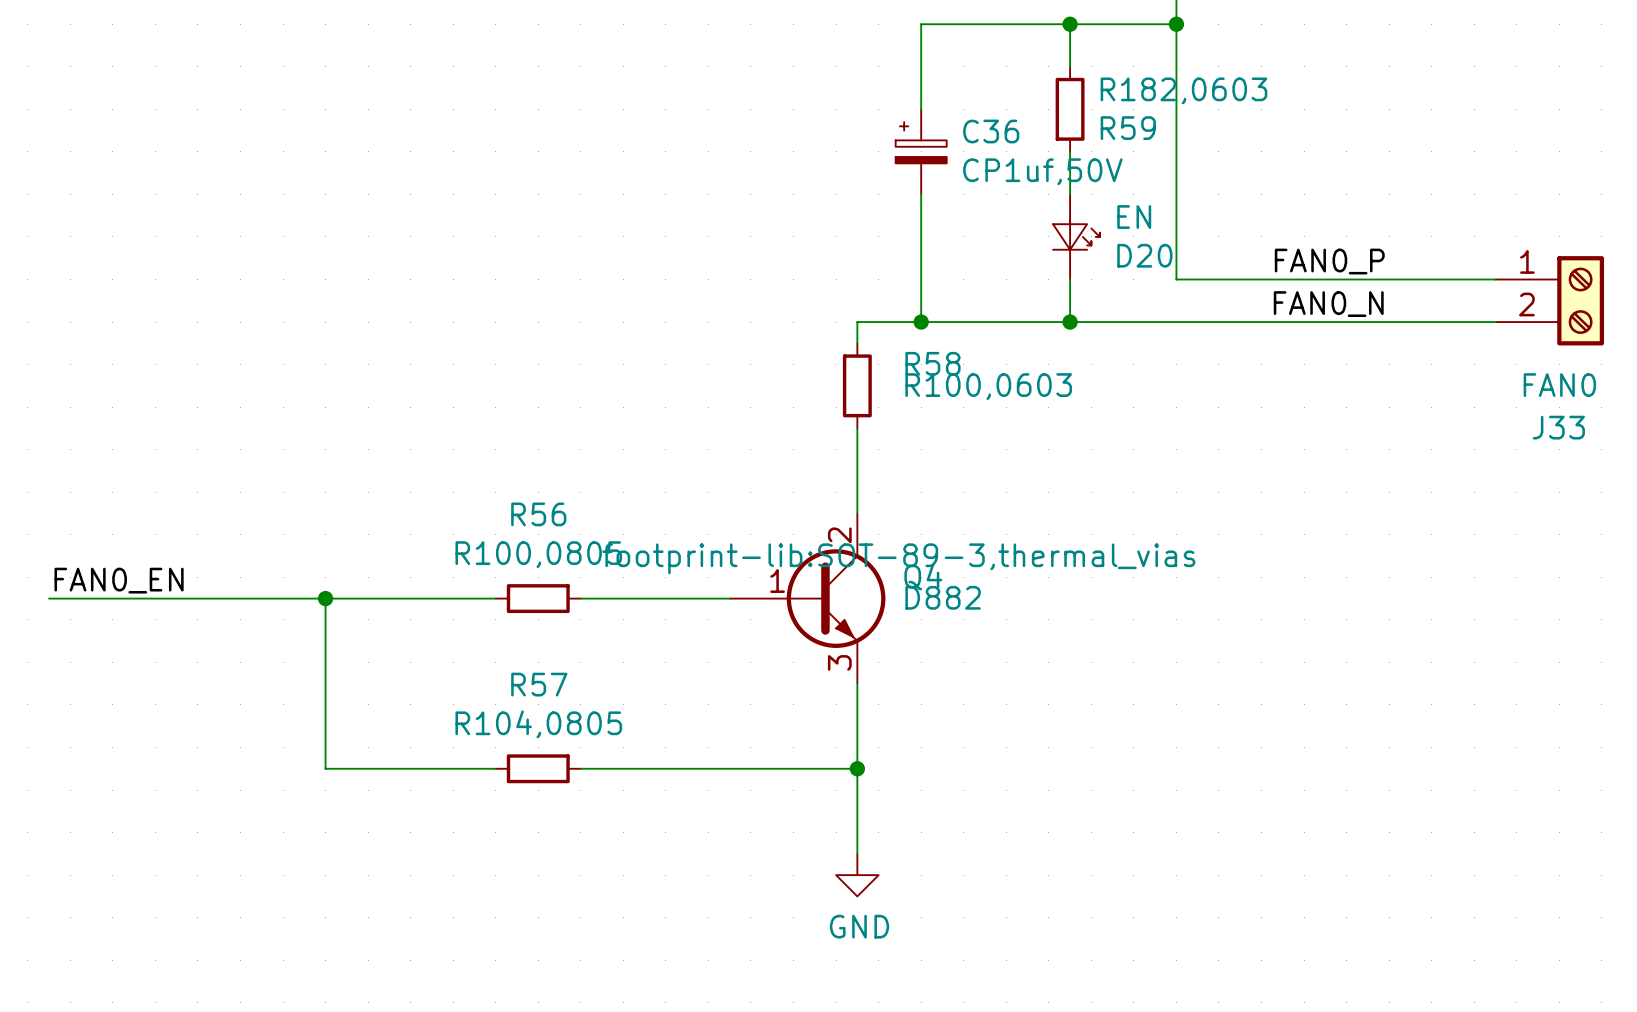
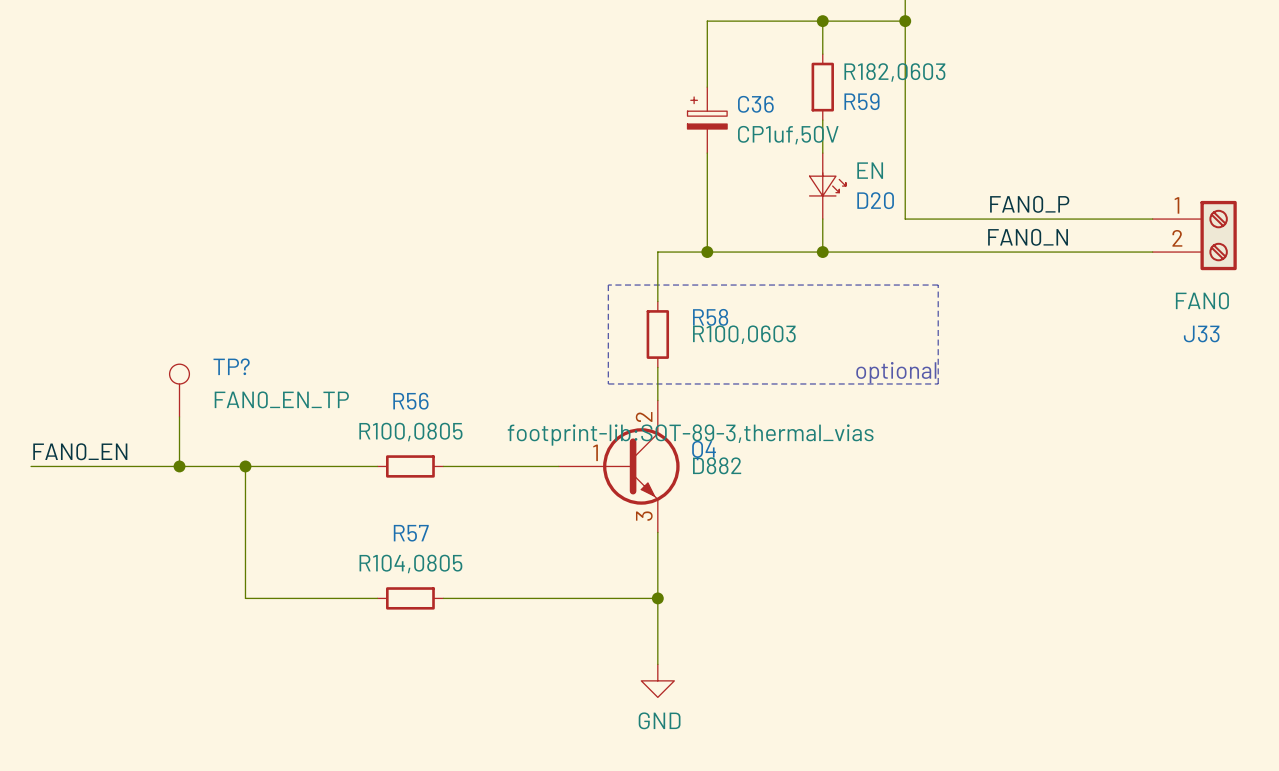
line: none -> (608, 285) (608, 383) (938, 383) (938, 285) (608, 285)
R58 position: (857, 385) -> (657, 334)
wire: (857, 428) (857, 470) -> (657, 268) (657, 301)
text: none -> optional (896, 372)
TP?: none -> FAN0_EN_TP (179, 390)
wire: none -> (179, 416) (179, 466)
junction: none -> (179, 466)

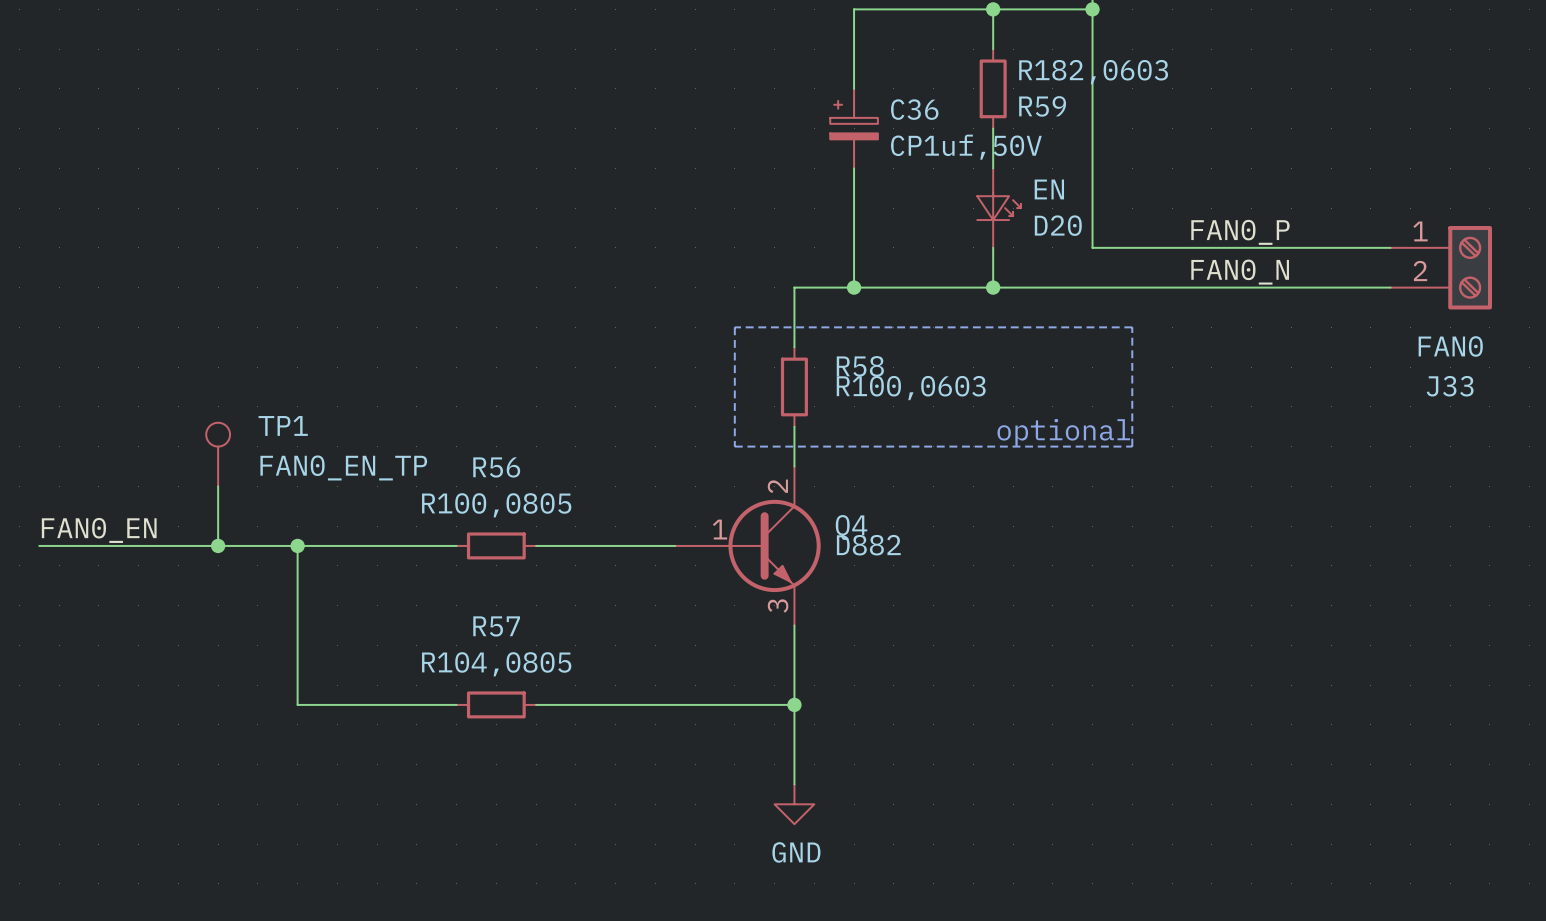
TP? name: TP? (231, 366) -> TP1 (283, 425)
Q4 text: footprint-lib:SOT-89-3,thermal_vias (690, 435) -> none

